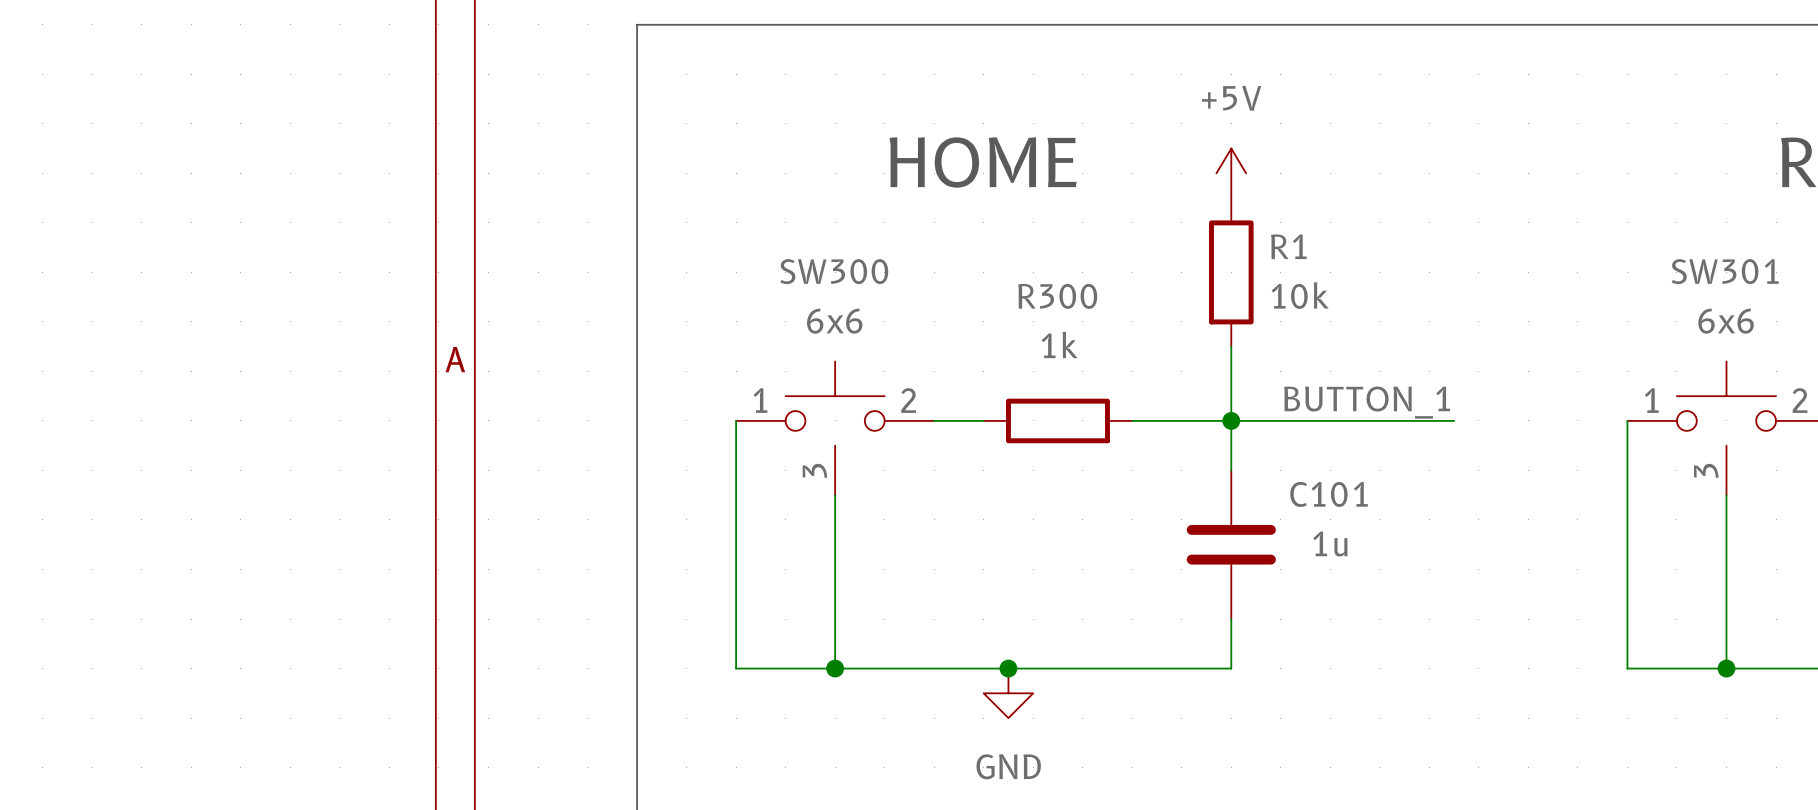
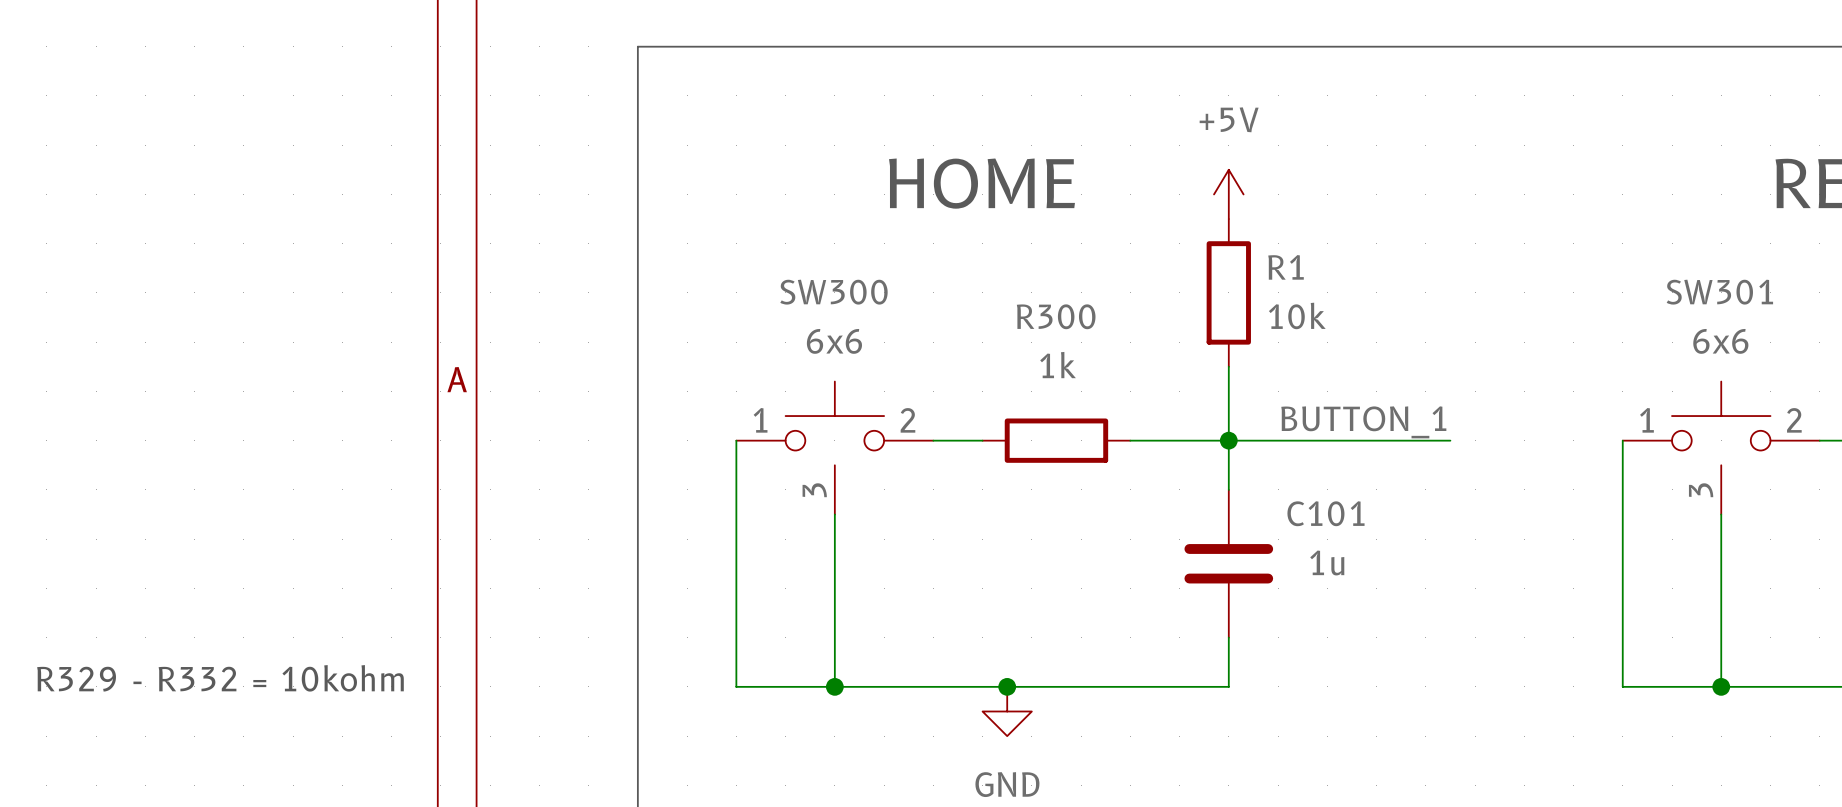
text: none -> R329 - R332 = 10kohm (220, 678)

